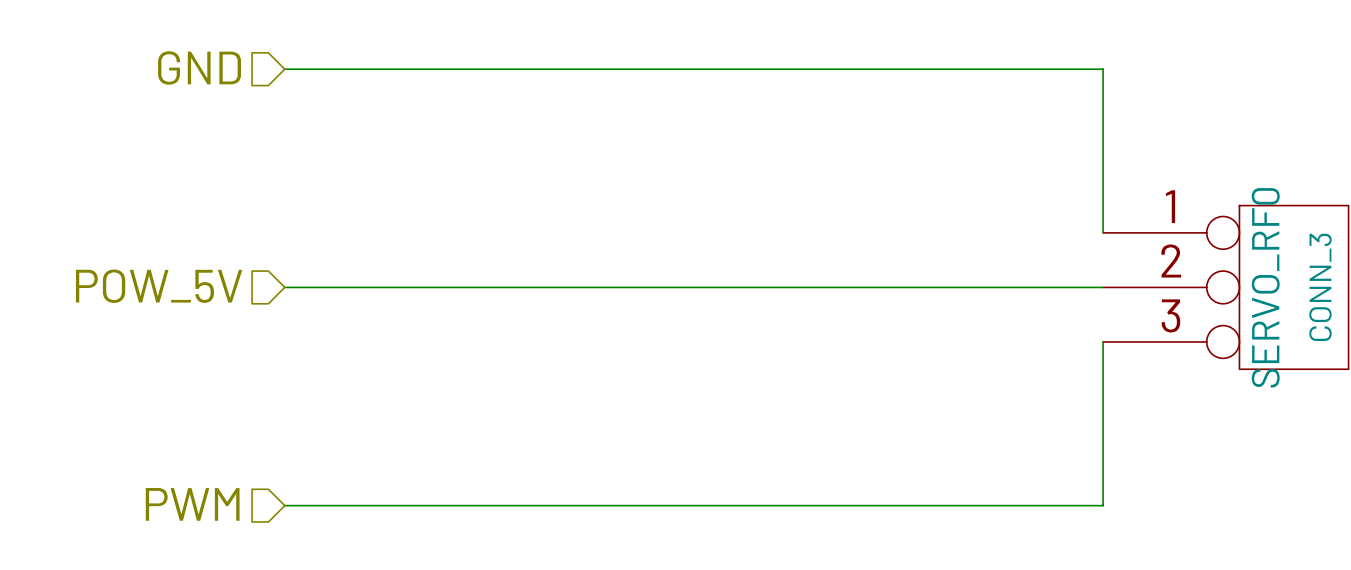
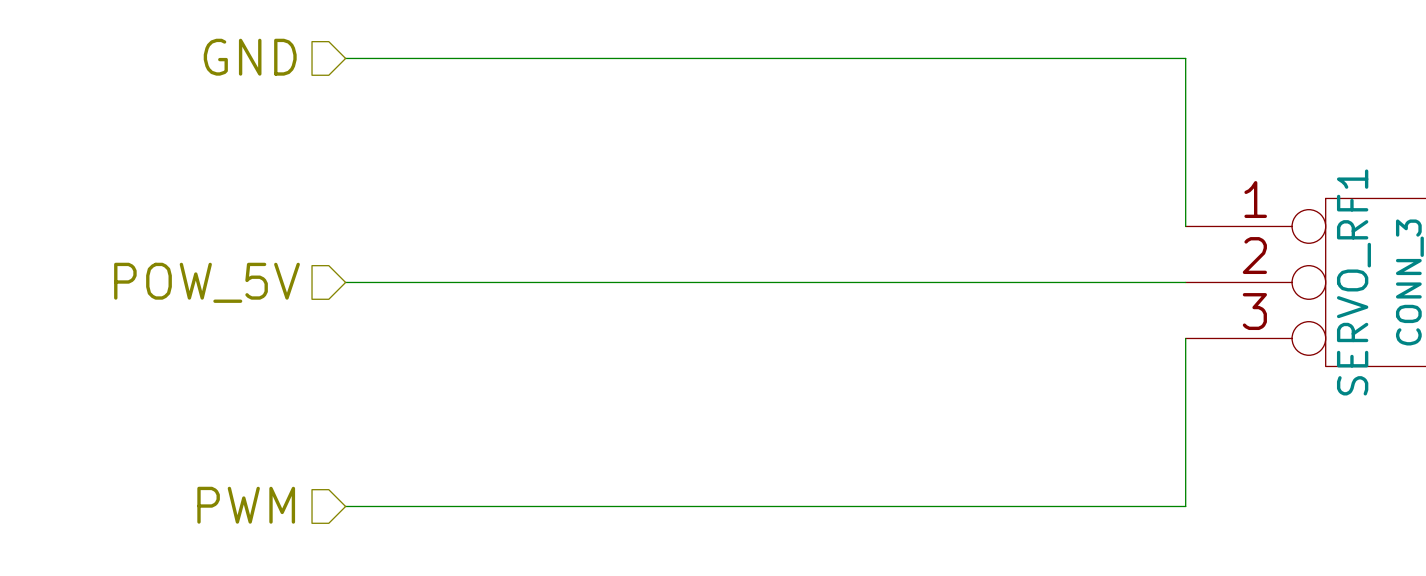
SERVO_RF0 name: SERVO_RF0 (1265, 287) -> SERVO_RF1 (1353, 282)

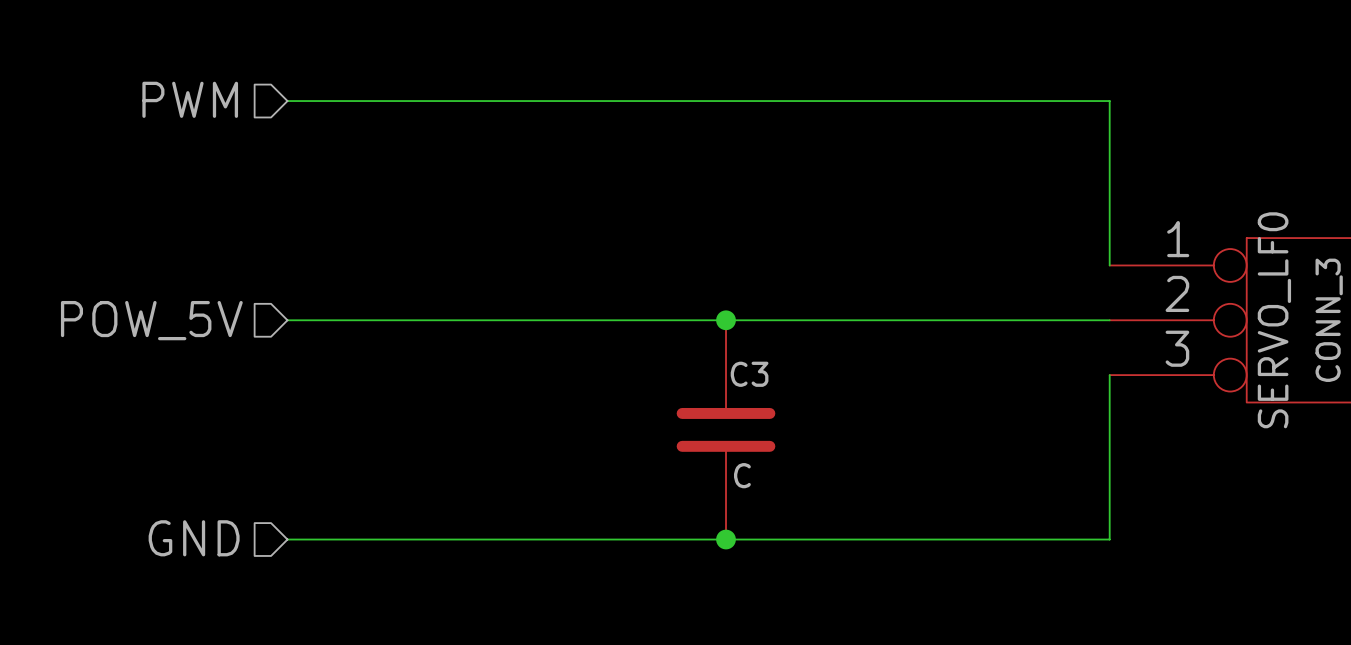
hierarchical label: GND (250, 57) -> PWM (190, 99)
junction: none -> (726, 320)
SERVO_RF1 name: SERVO_RF1 (1353, 282) -> SERVO_LF0 (1274, 320)
C3: none -> C (726, 429)
hierarchical label: PWM (246, 505) -> GND (194, 538)
junction: none -> (726, 539)

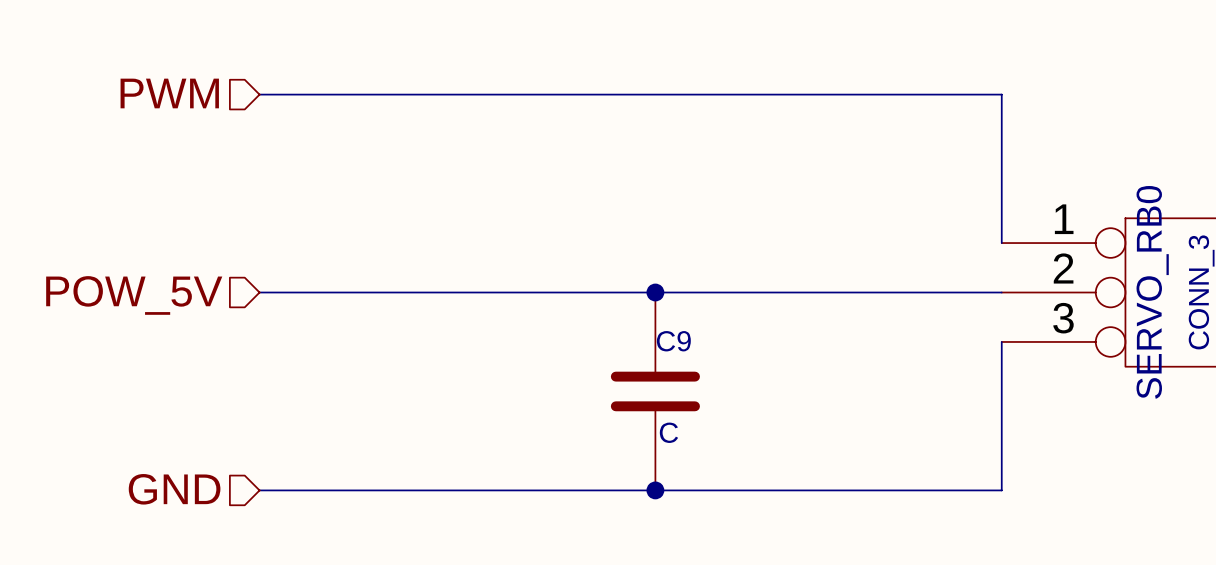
SERVO_LF0 name: SERVO_LF0 (1274, 320) -> SERVO_RB0 (1152, 292)
C3 name: C3 (749, 374) -> C9 (673, 341)

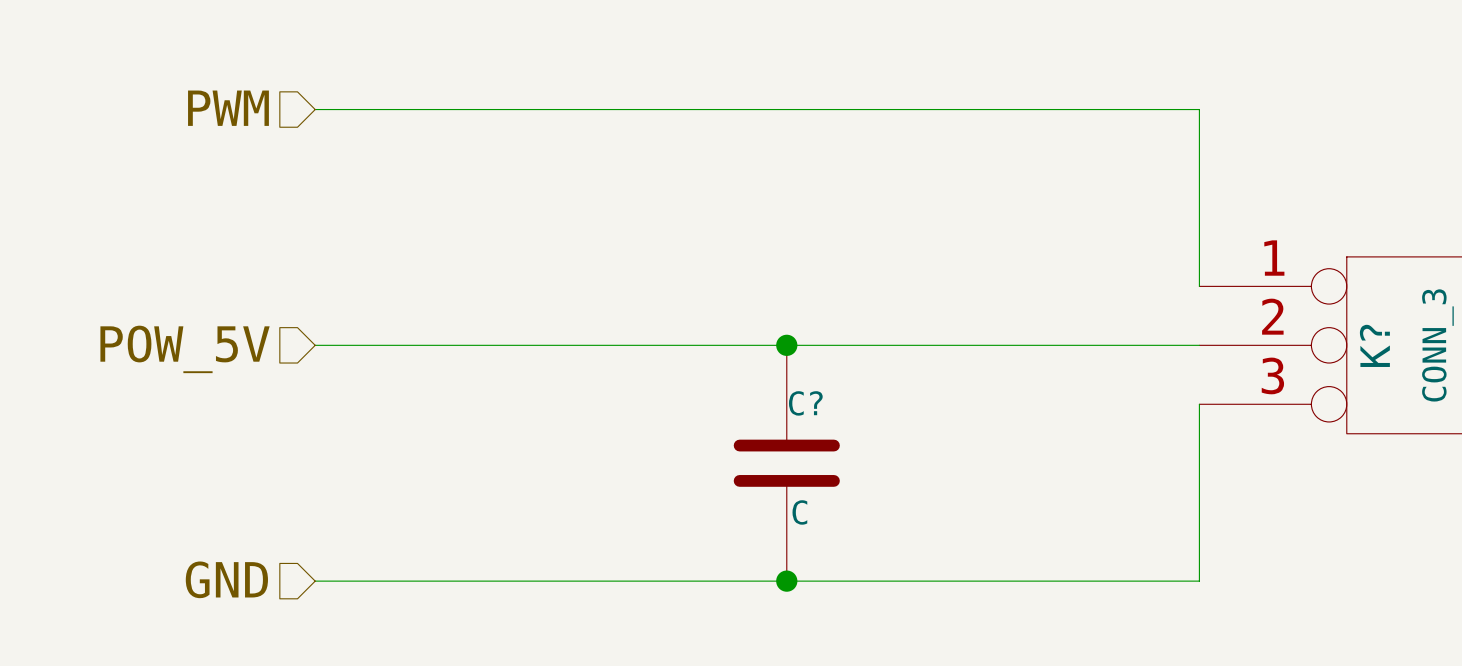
SERVO_RB0 name: SERVO_RB0 (1152, 292) -> K? (1374, 345)
C9 name: C9 (673, 341) -> C? (805, 403)

